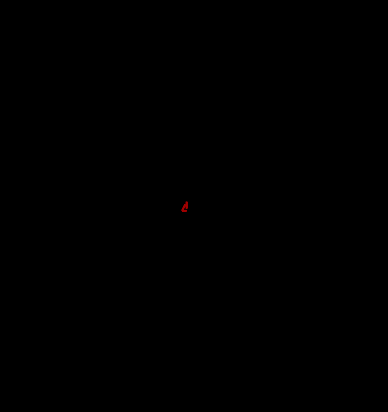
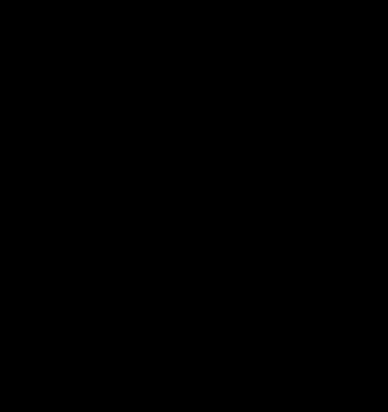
zone outline: (186, 201) (182, 210) (186, 210) (186, 201) -> none

